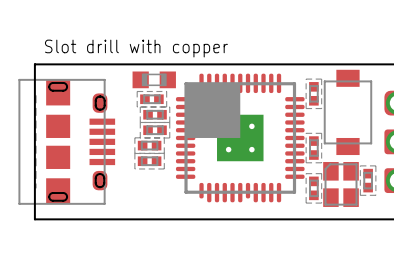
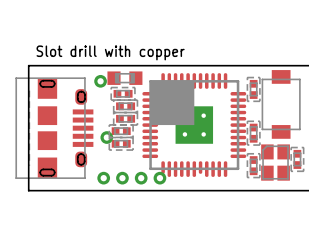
part: none -> (100, 81)
part: none -> (106, 137)
part: none -> (103, 178)
part: none -> (122, 178)
part: none -> (141, 178)
part: none -> (159, 178)

